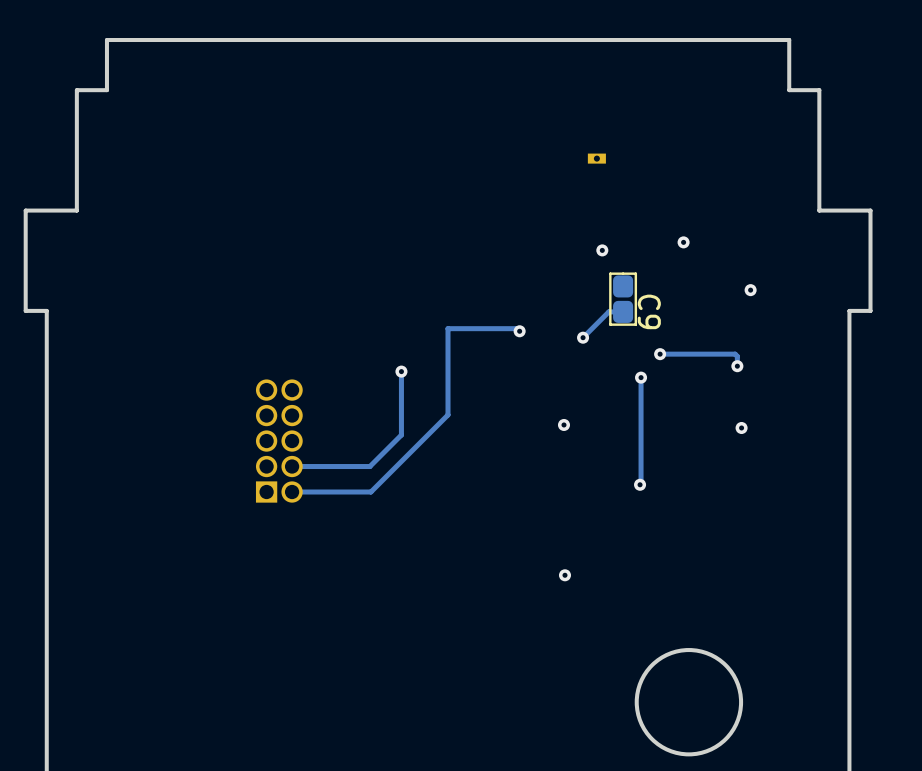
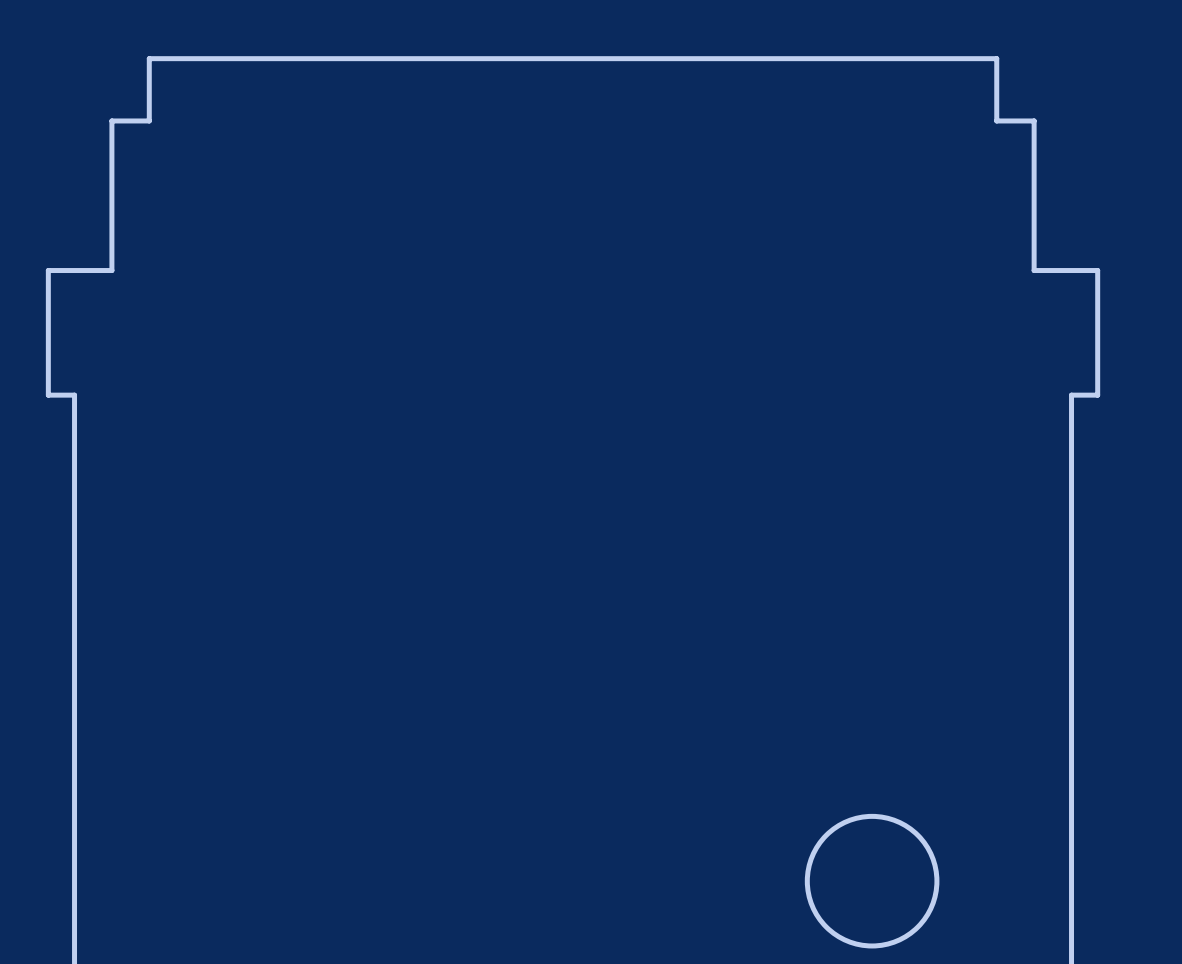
part: (596, 158) -> none
via: (683, 242) -> none
via: (602, 250) -> none
via: (750, 290) -> none
C9: (623, 299) -> none
track: (623, 311) (608, 311) (583, 337) -> none
track: (519, 331) (517, 328) (448, 328) (448, 414) (370, 492) (292, 492) -> none
via: (519, 331) -> none
via: (583, 337) -> none
track: (660, 354) (735, 354) (737, 356) (737, 366) -> none
via: (660, 354) -> none
via: (737, 366) -> none
track: (401, 371) (401, 435) (369, 466) (292, 466) -> none
via: (401, 371) -> none
track: (641, 377) (640, 484) -> none
via: (641, 377) -> none
via: (563, 424) -> none
via: (741, 427) -> none
part: (279, 441) -> none
via: (640, 484) -> none
via: (564, 575) -> none

